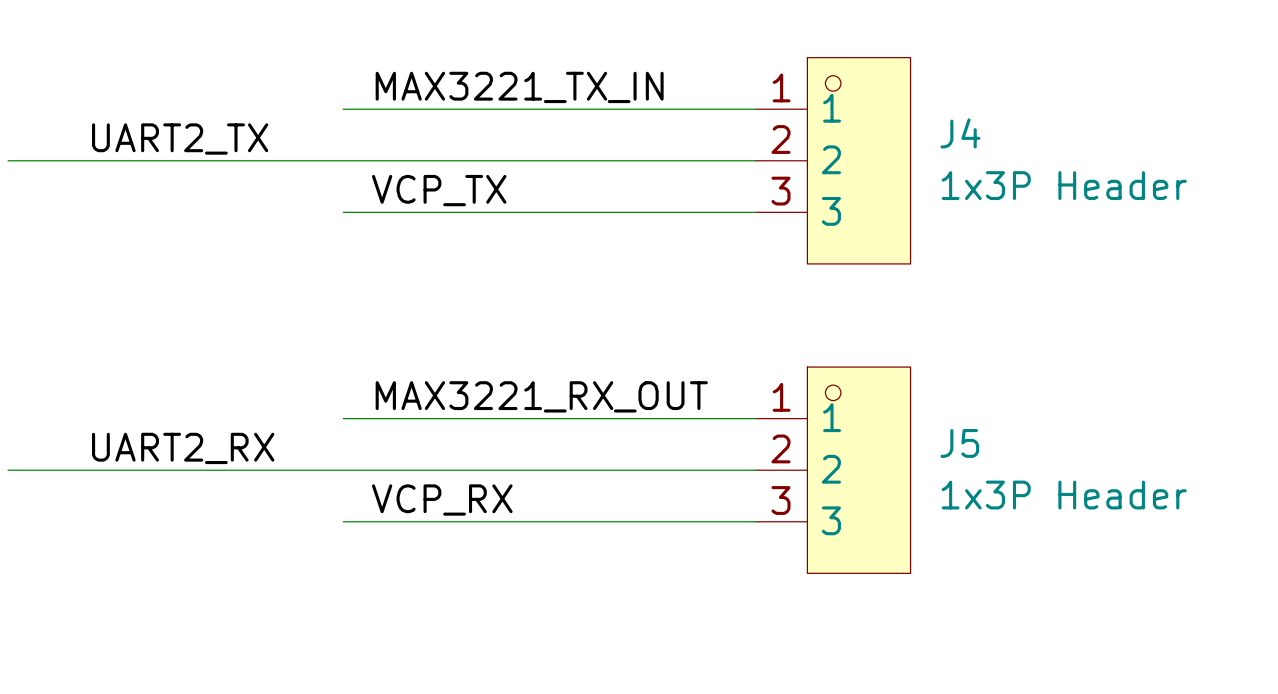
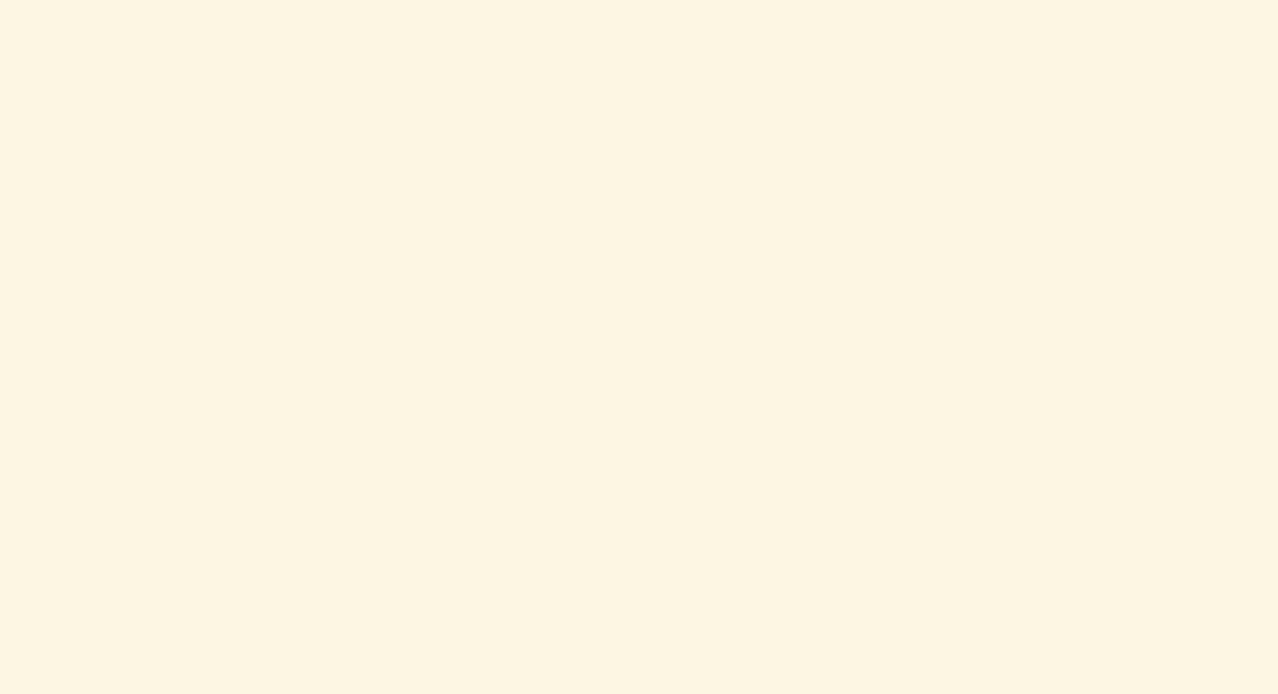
label: MAX3221_TX_IN (519, 87) -> none
wire: (343, 109) (755, 109) -> none
label: UART2_TX (180, 139) -> none
wire: (8, 160) (755, 160) -> none
J4: (833, 160) -> none
label: VCP_TX (439, 190) -> none
wire: (343, 212) (755, 212) -> none
label: MAX3221_RX_OUT (541, 396) -> none
wire: (343, 418) (755, 418) -> none
label: UART2_RX (183, 448) -> none
wire: (8, 470) (755, 470) -> none
J5: (833, 470) -> none
label: VCP_RX (442, 500) -> none
wire: (343, 521) (755, 521) -> none

